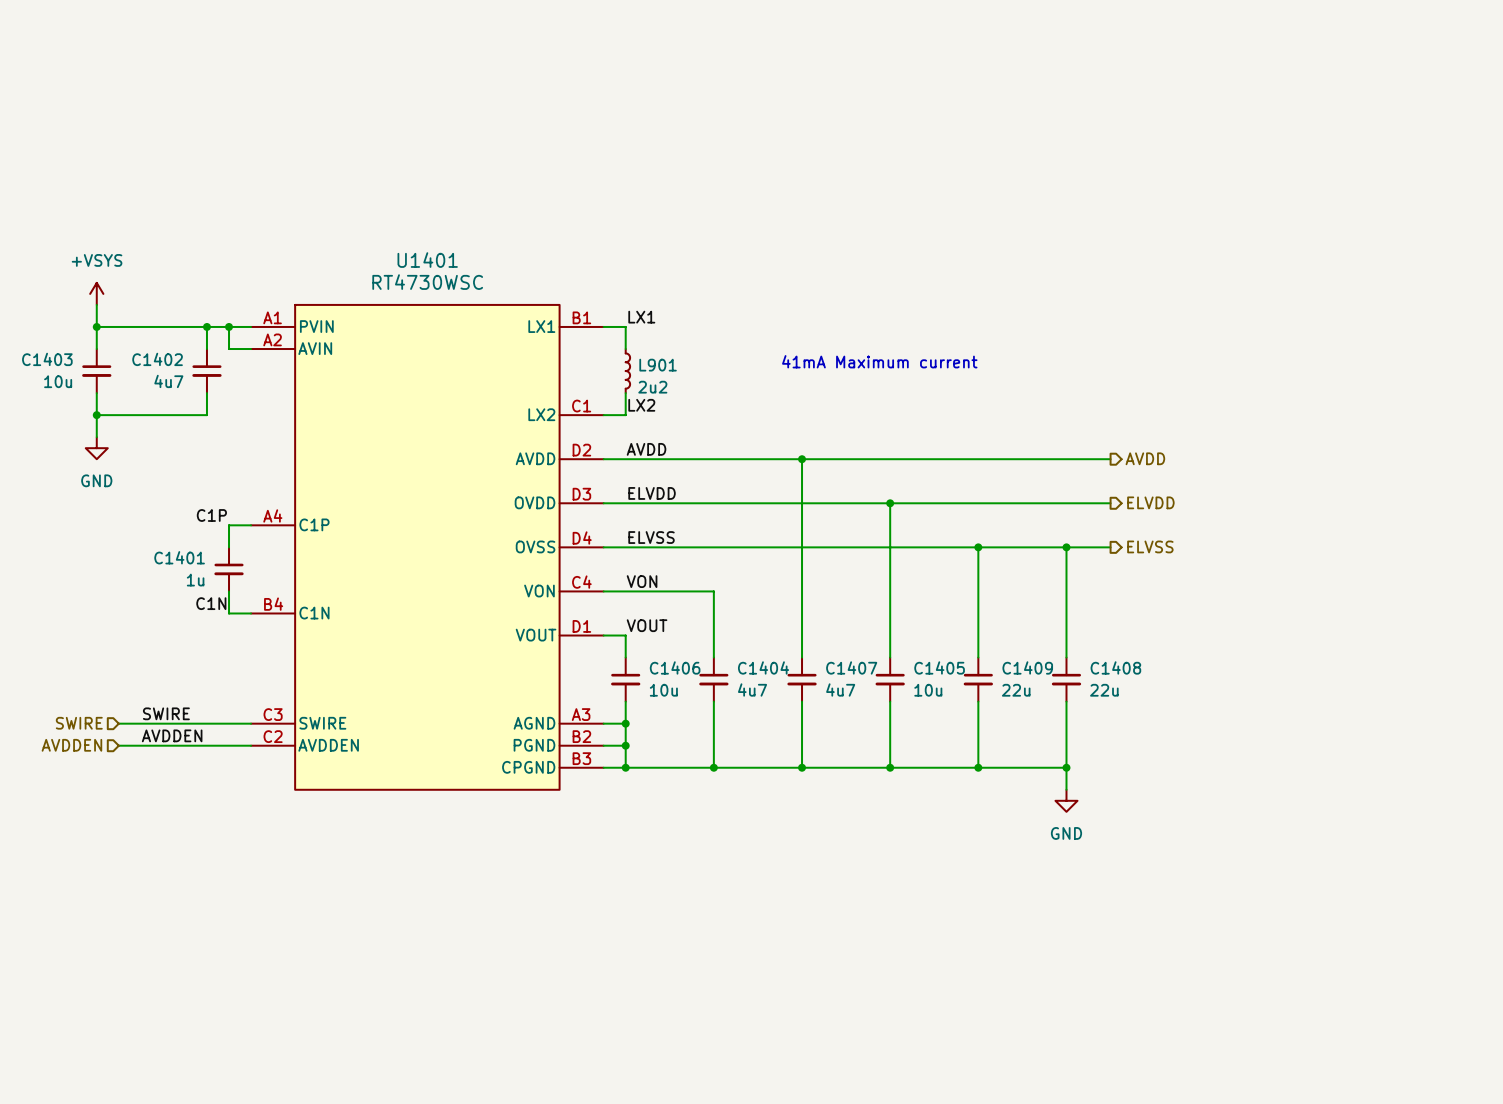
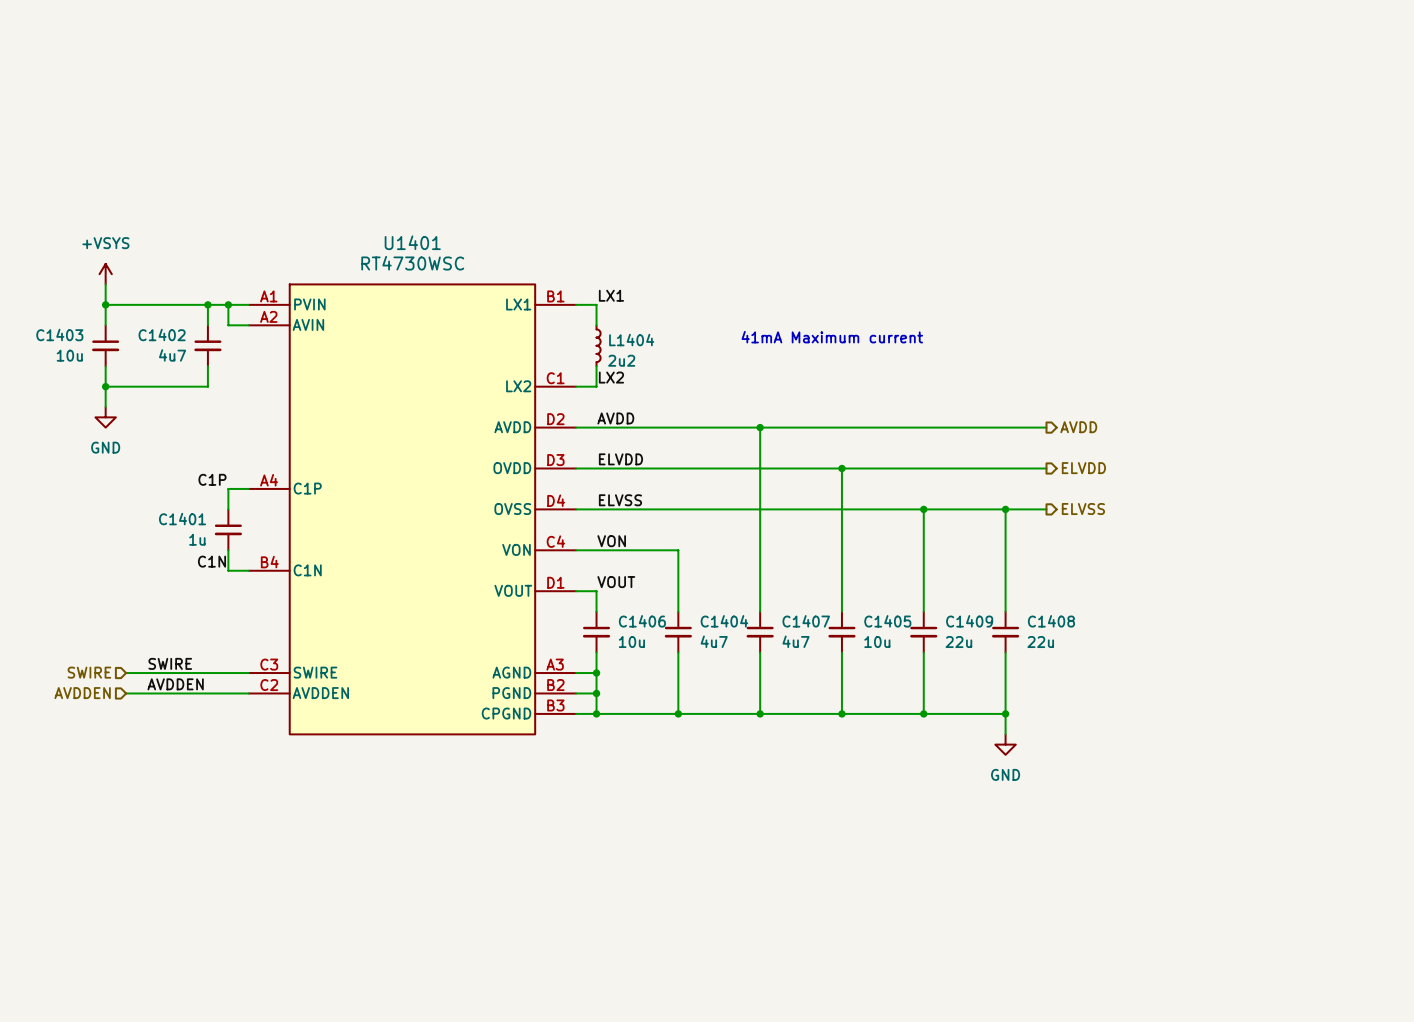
L901 name: L901 (658, 365) -> L1404 (631, 340)

